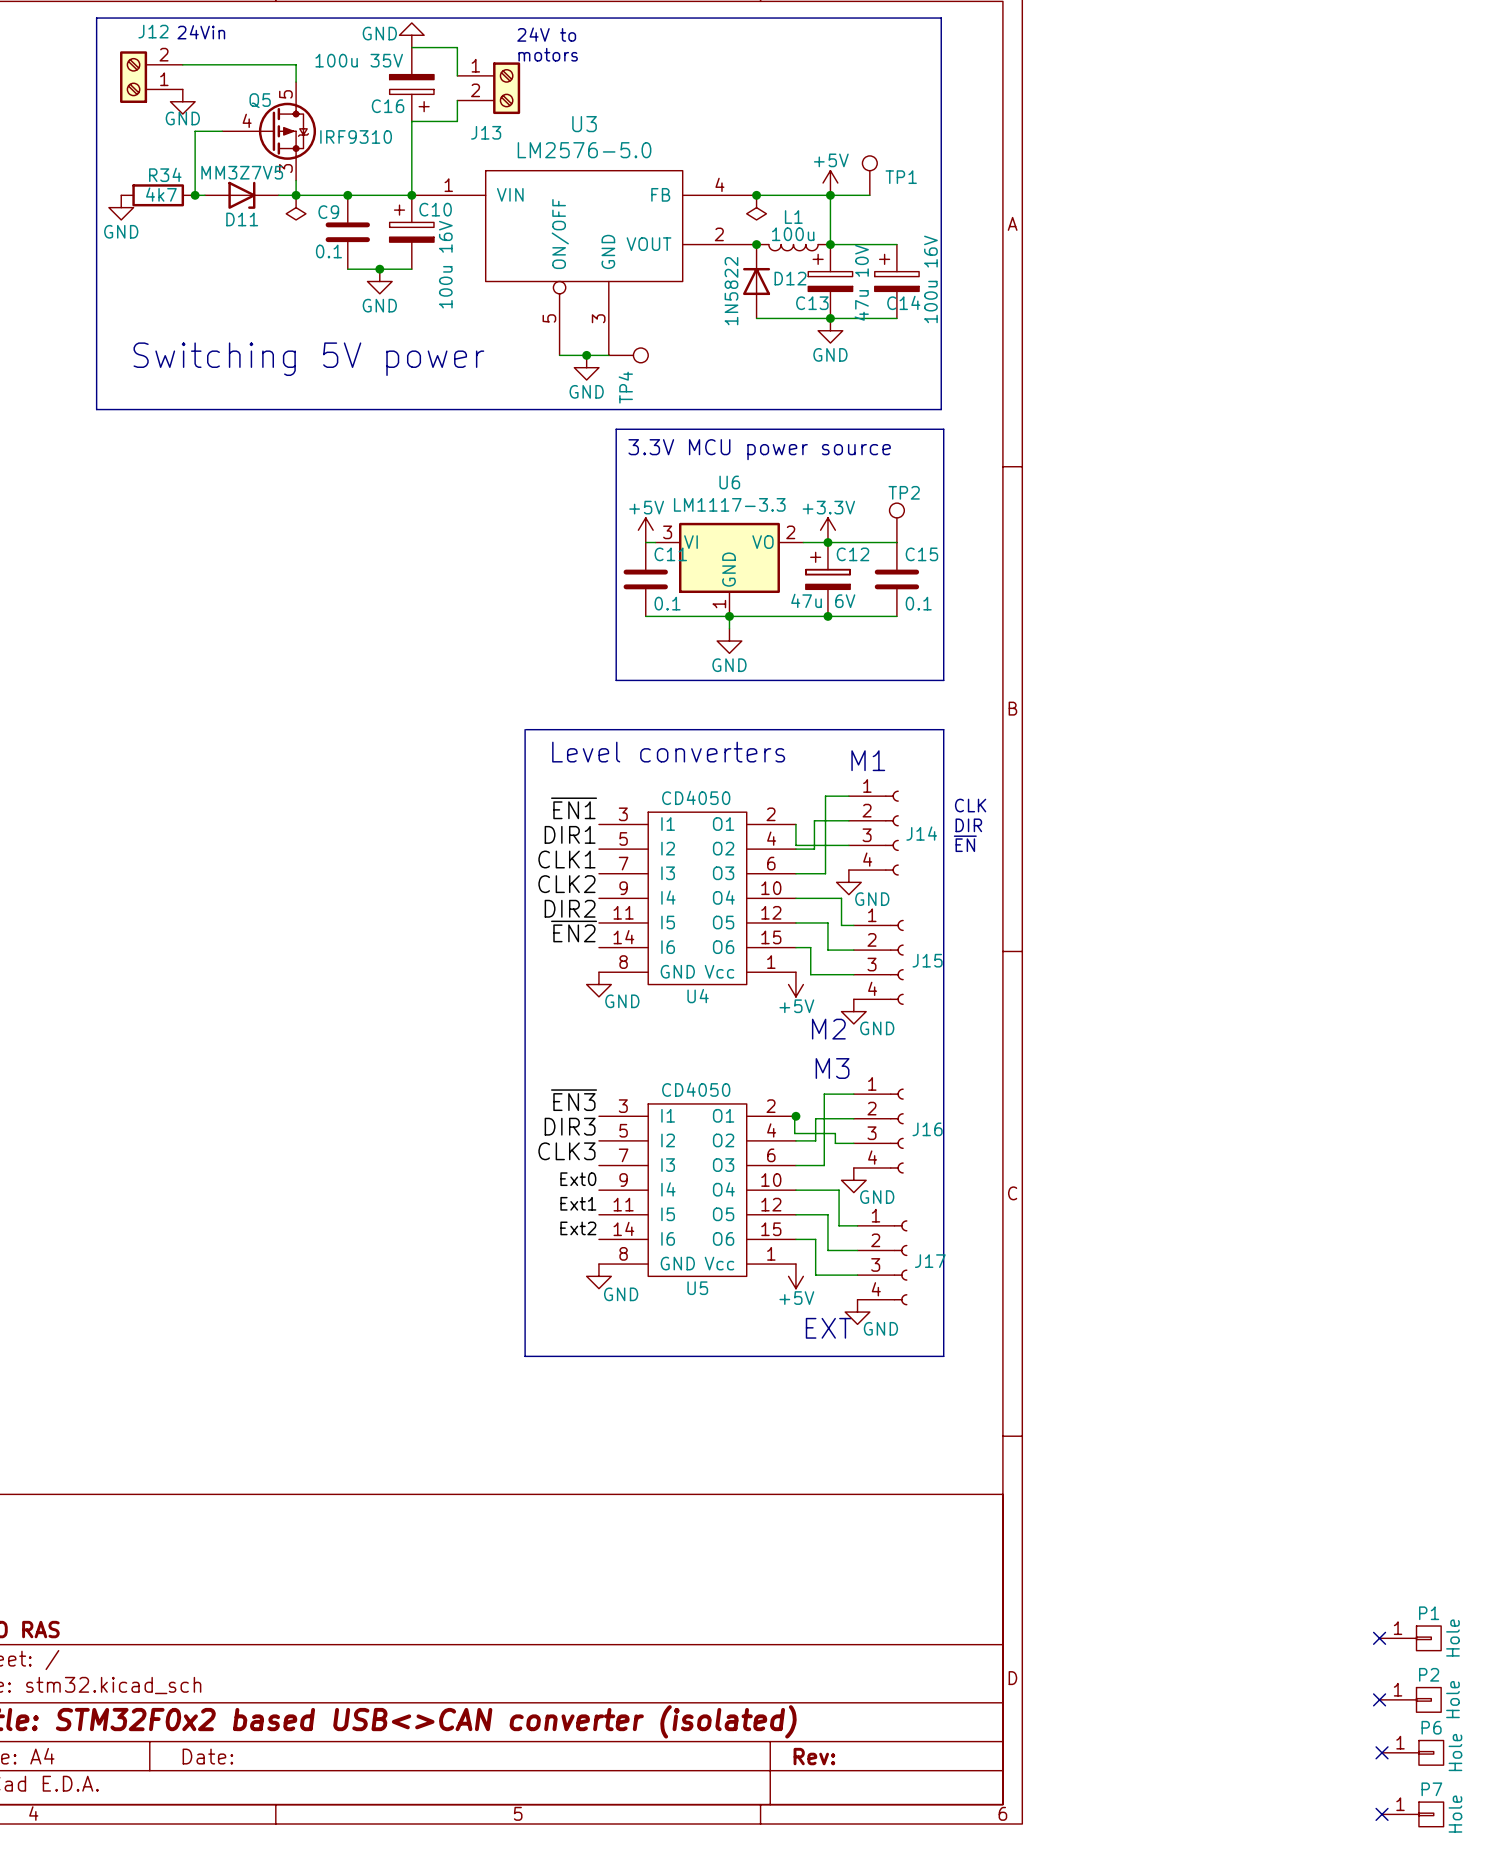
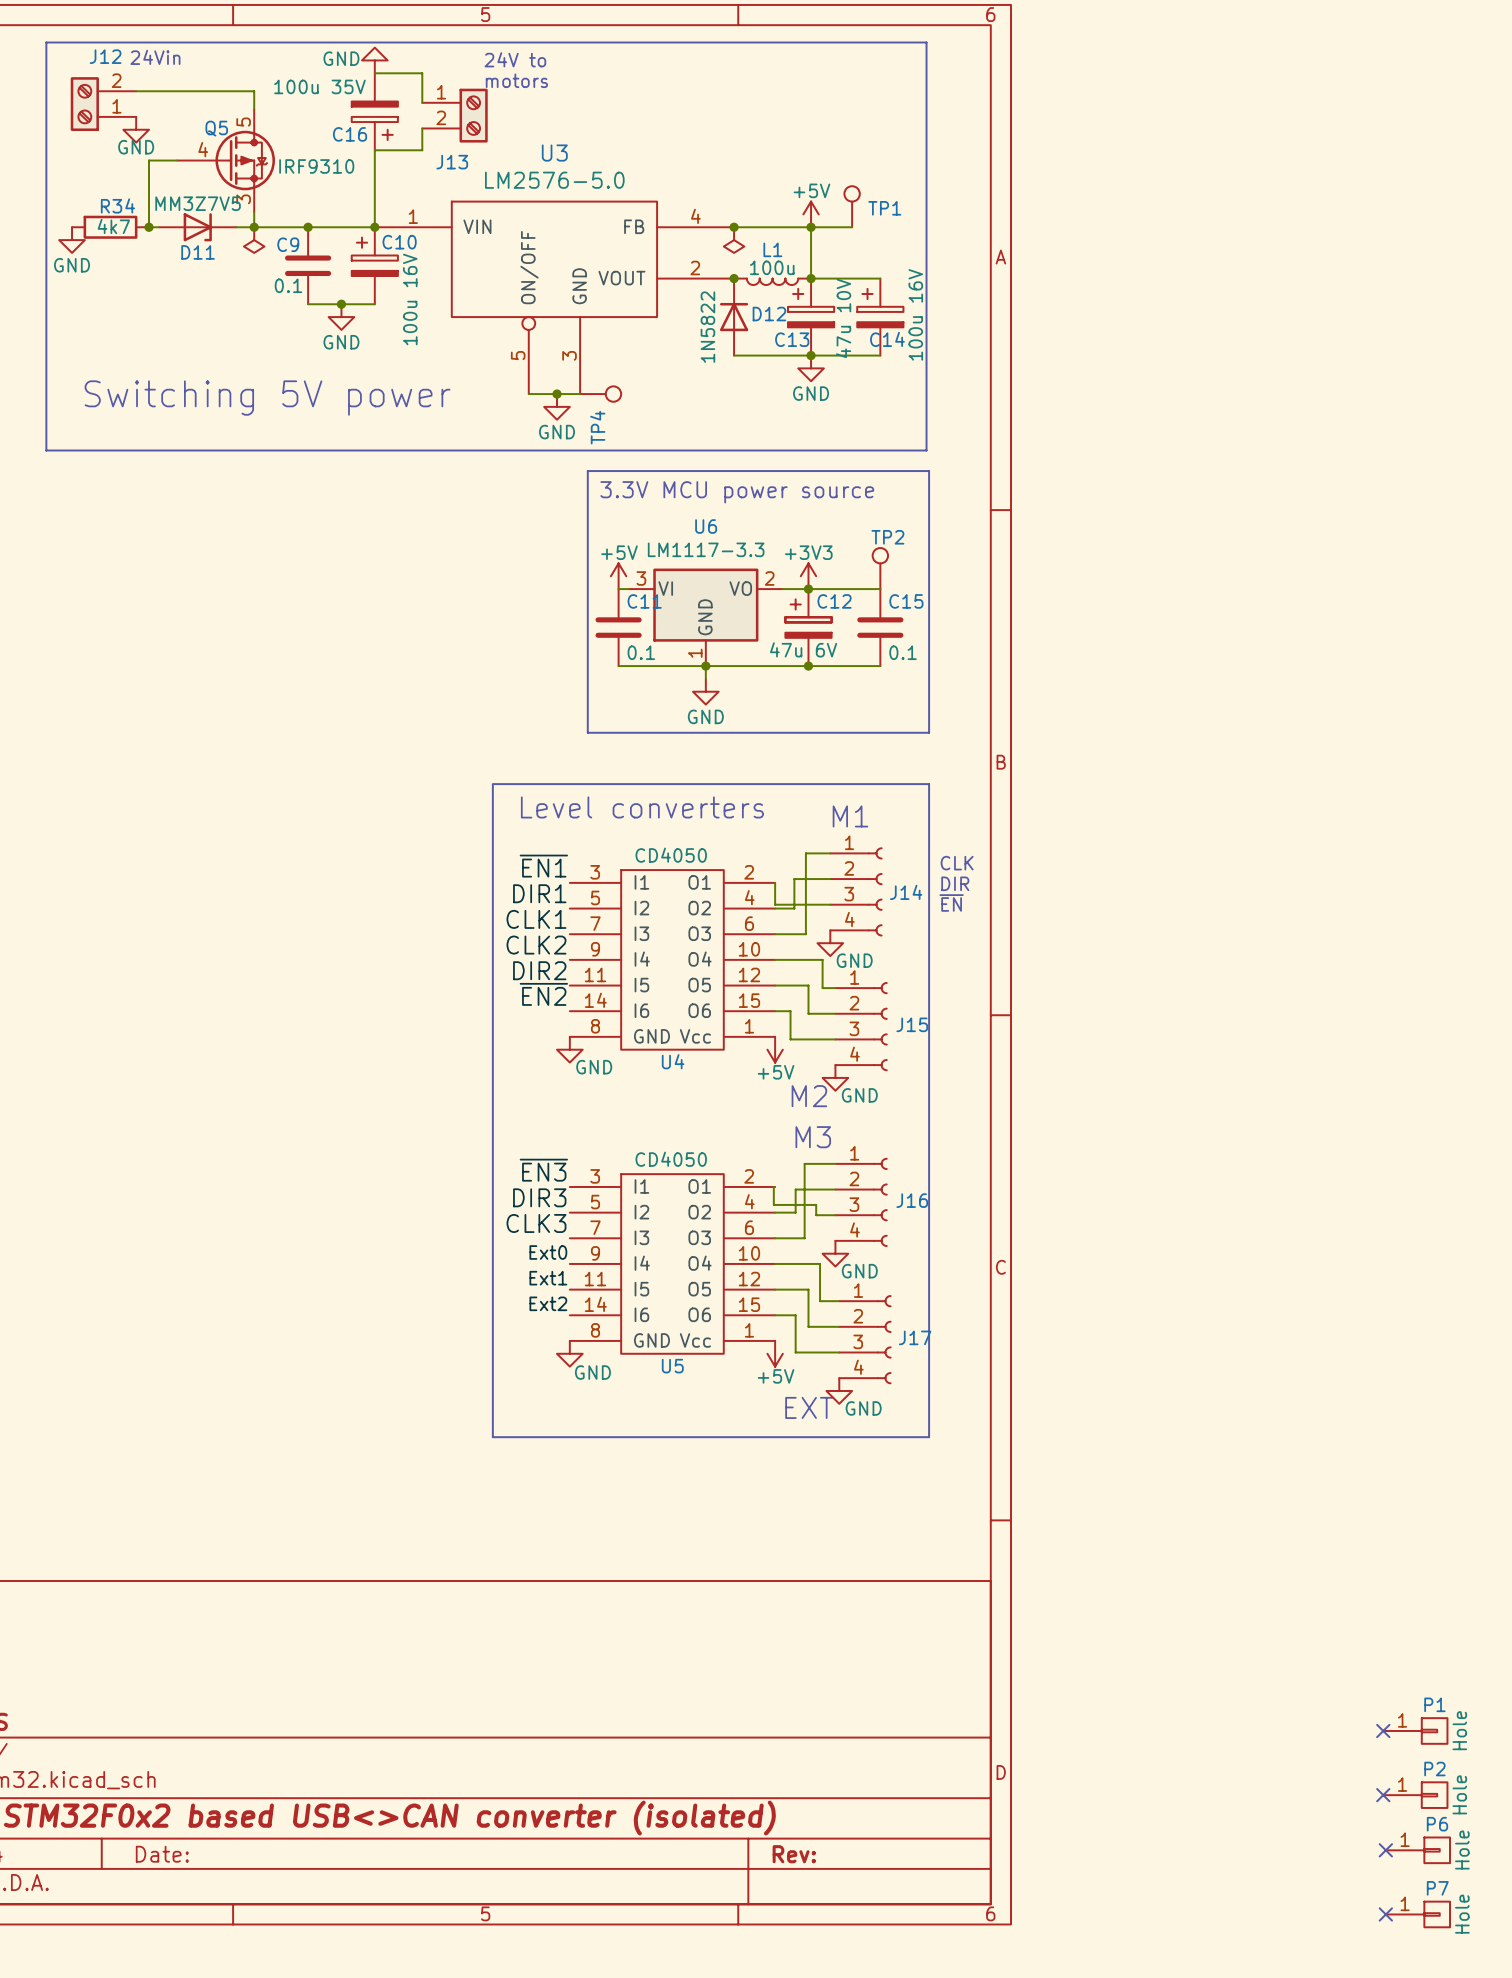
power symbol: +3.3V (827, 530) -> +3V3 (808, 576)
junction: (795, 1116) -> none

